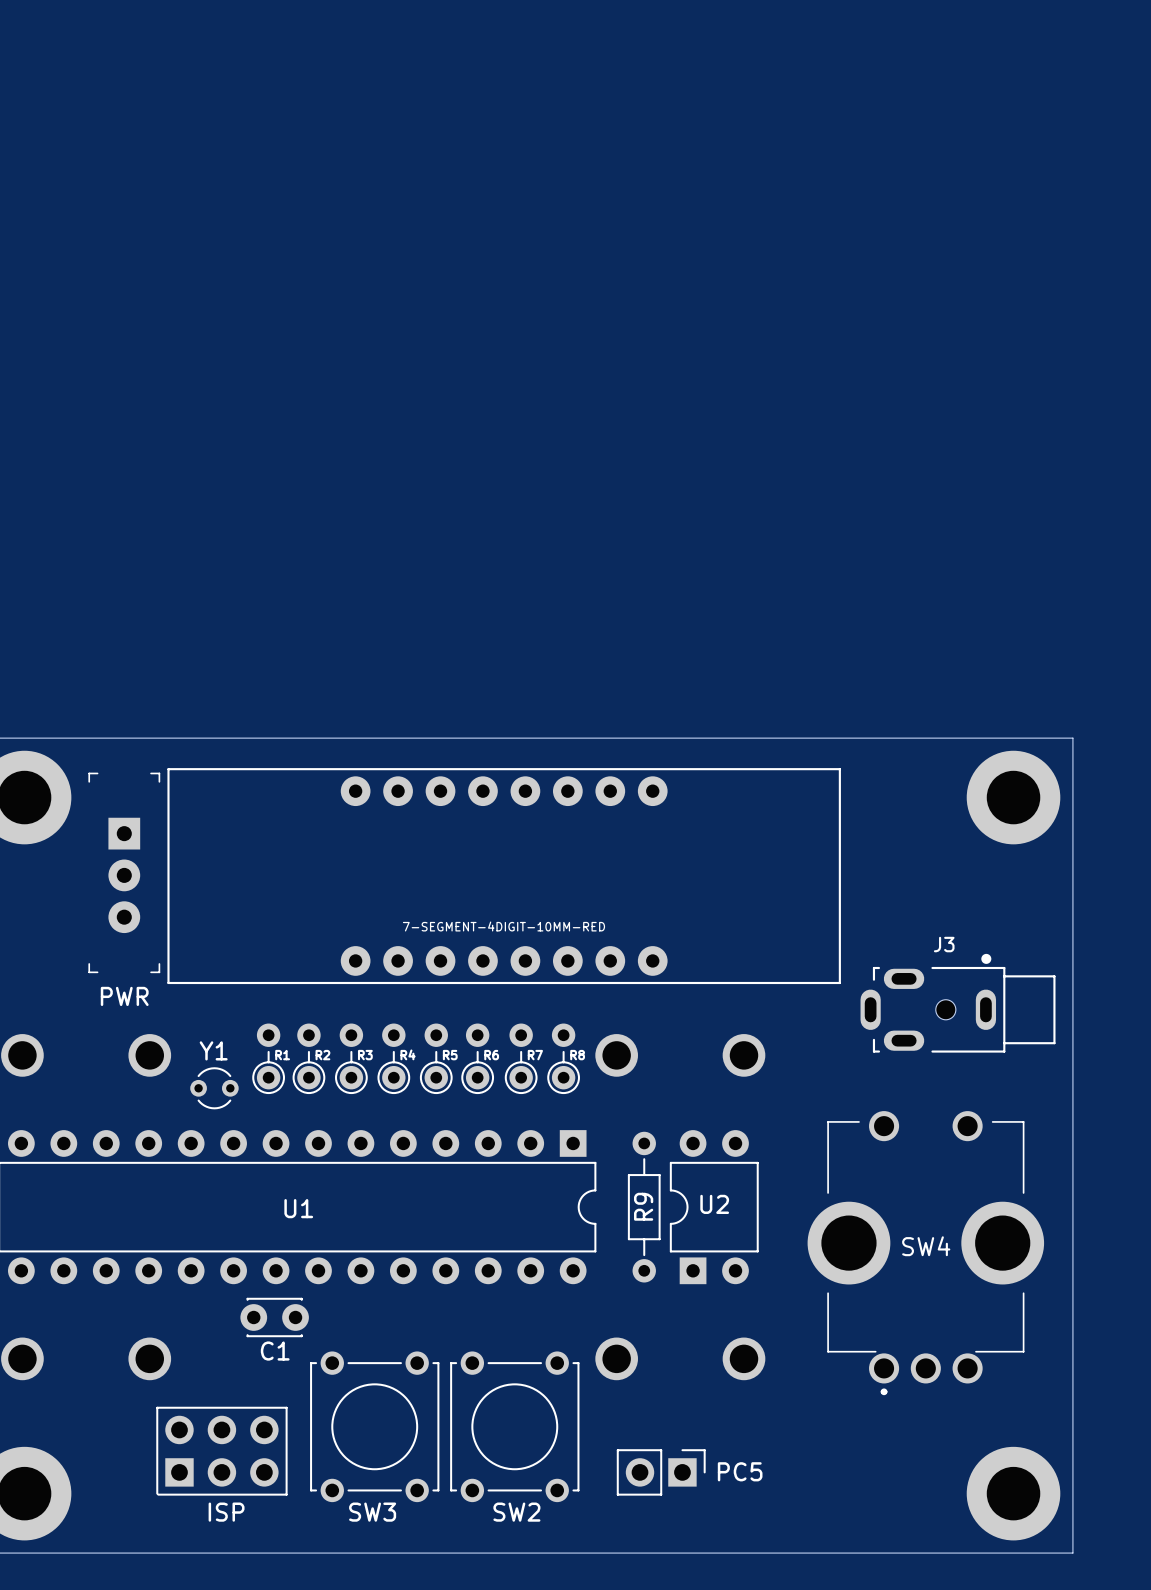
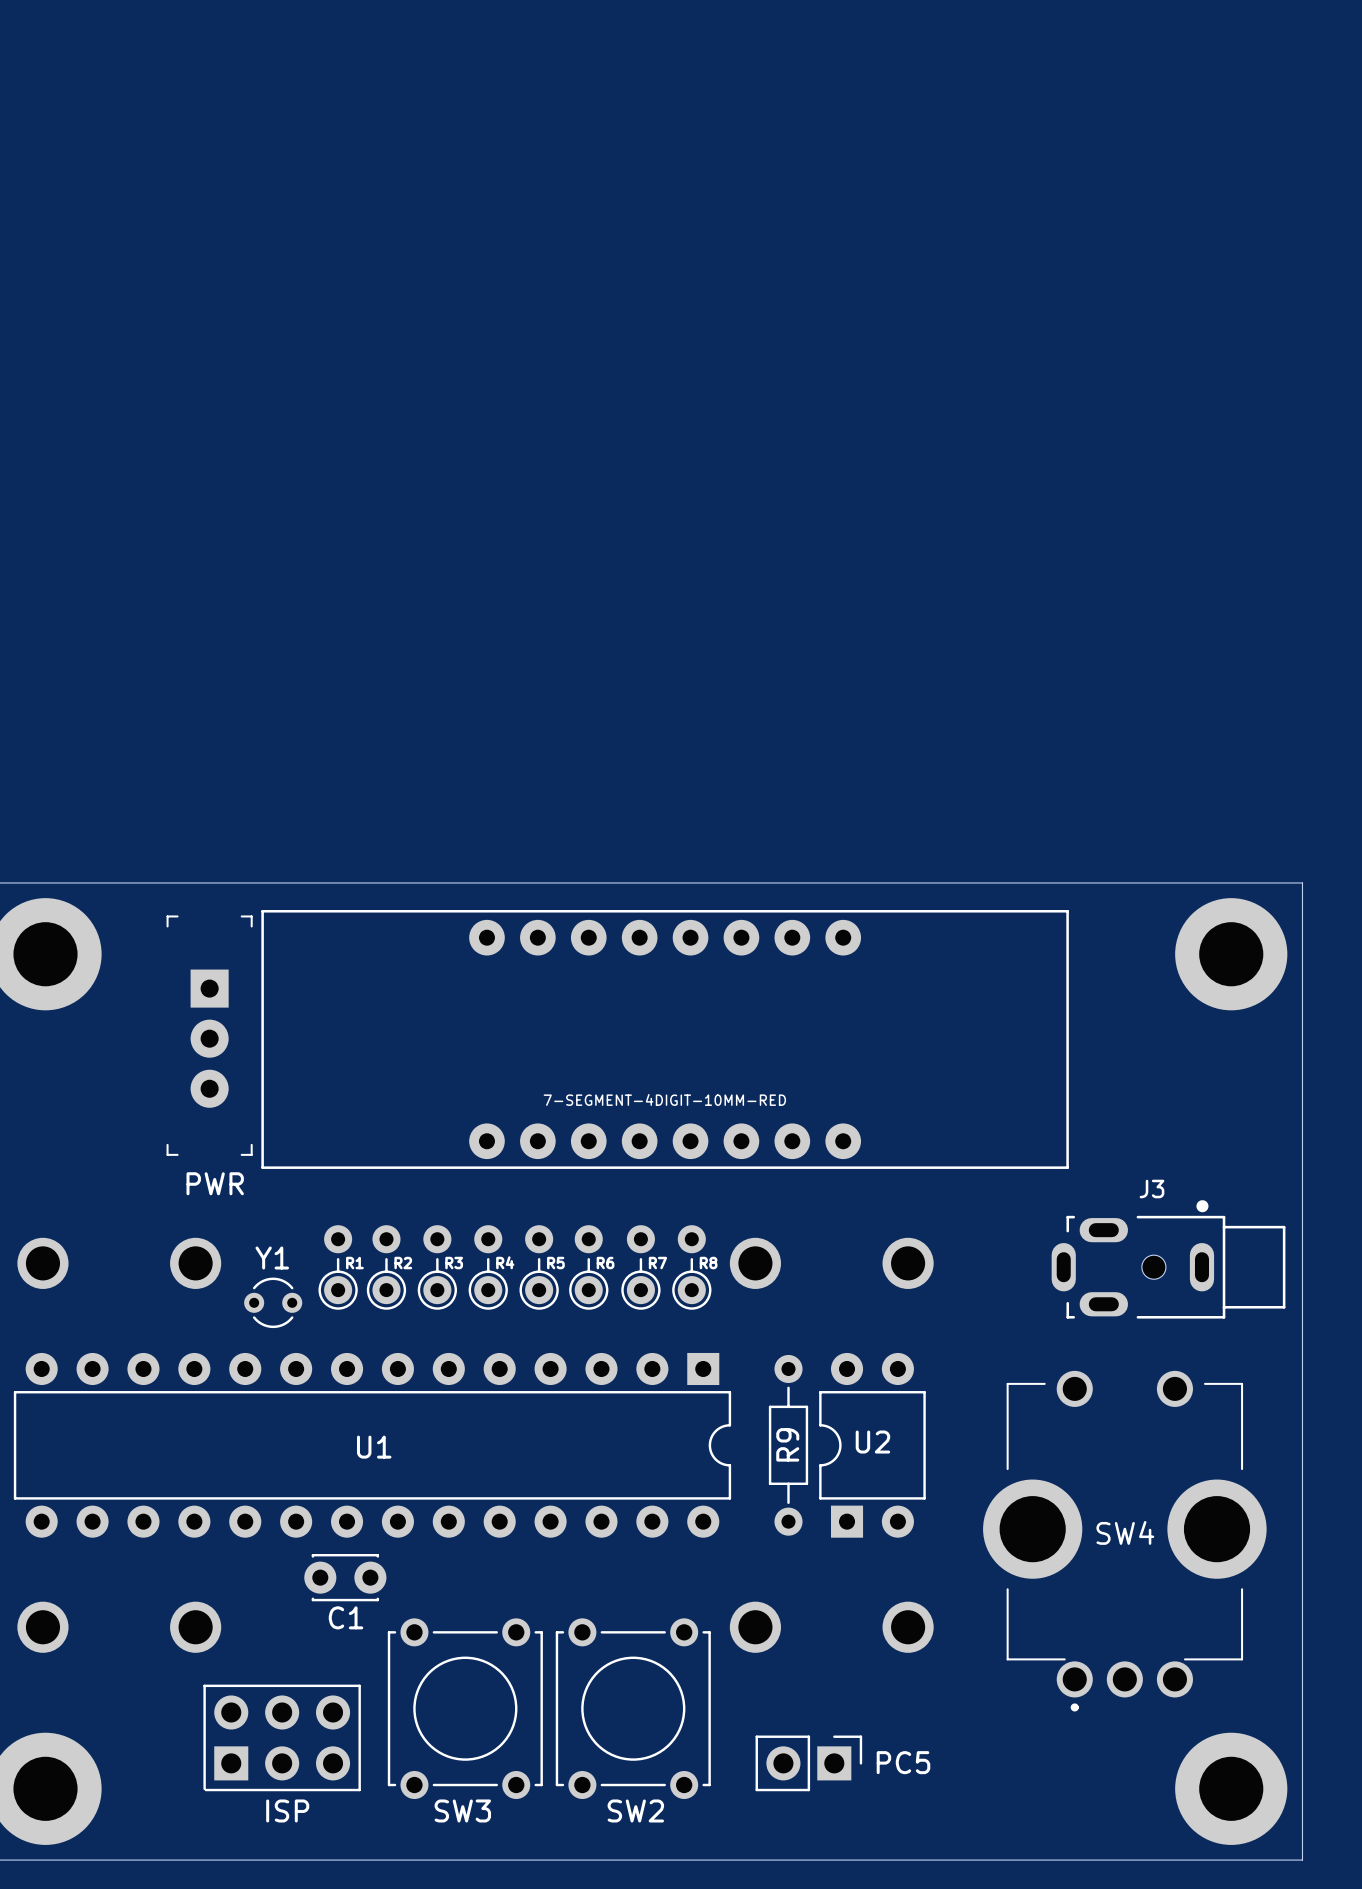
part position: (124, 872) -> (209, 1035)
part position: (504, 876) -> (665, 1039)
text position: PWR (124, 996) -> PWR (215, 1183)
J3 position: (958, 1003) -> (1168, 1259)
SW4 position: (925, 1253) -> (1124, 1541)

